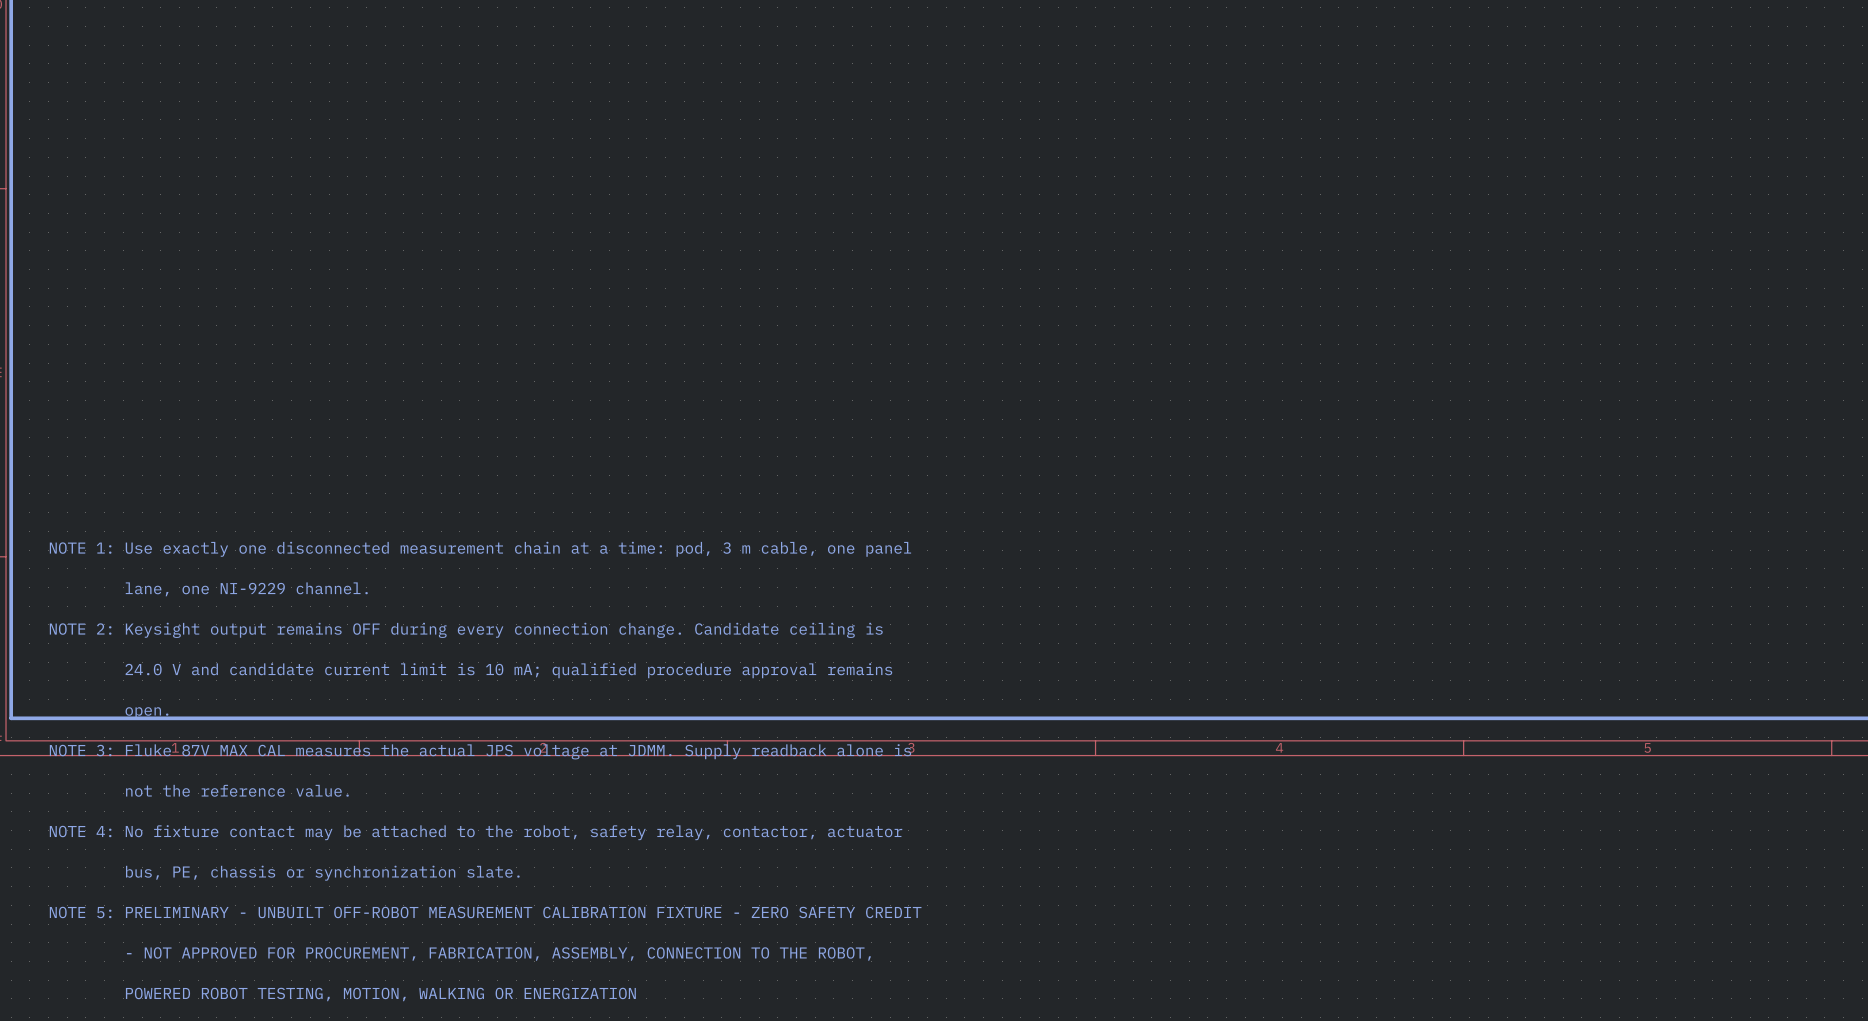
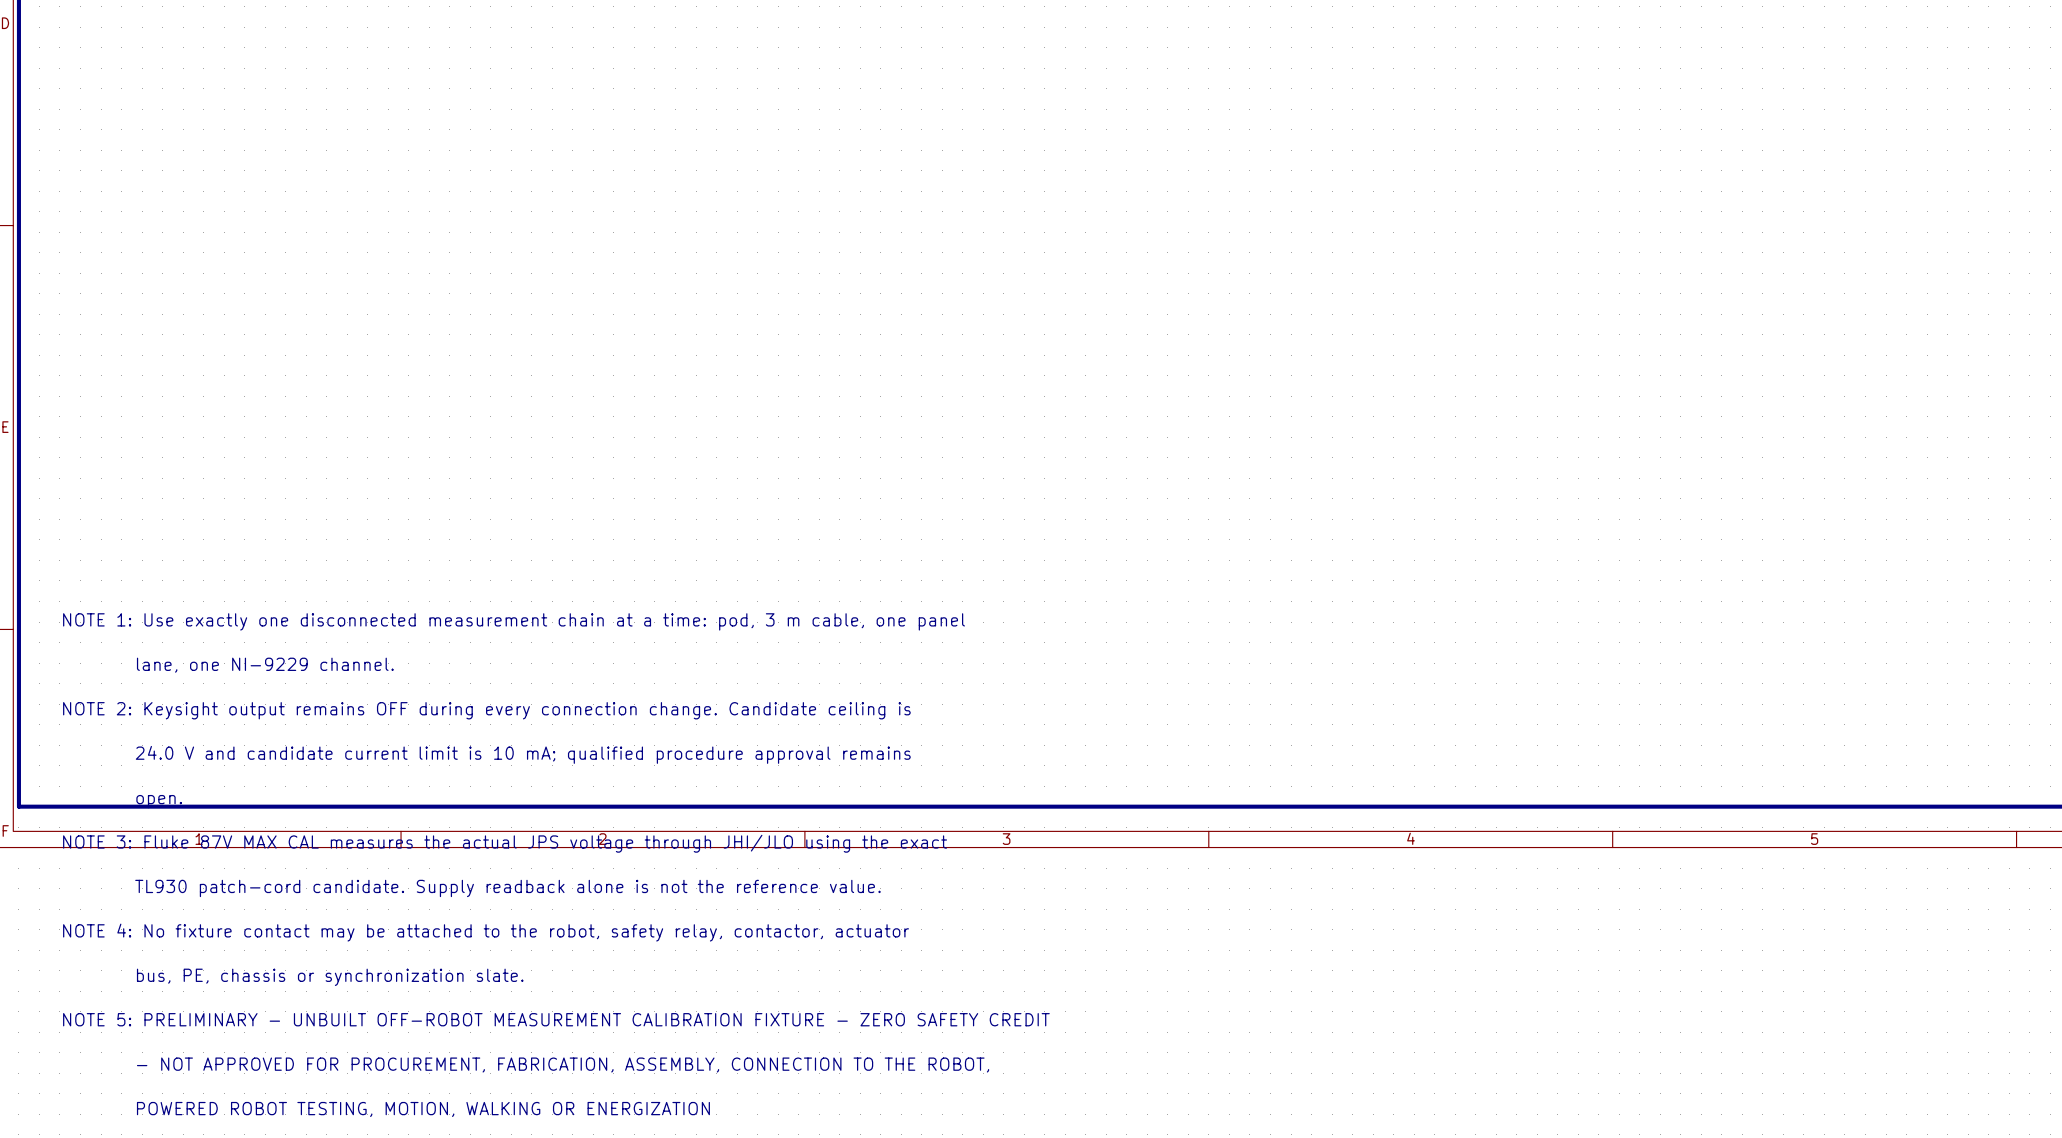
text: NOTE 3: Fluke 87V MAX CAL measures the actual JPS voltage at JDMM. Supply readback alone is (480, 751) -> NOTE 3: Fluke 87V MAX CAL measures the actual JPS voltage through JHI/JLO using the exact (505, 843)
text: not the reference value. (237, 790) -> TL930 patch-cord candidate. Supply readback alone is not the reference value. (507, 888)

